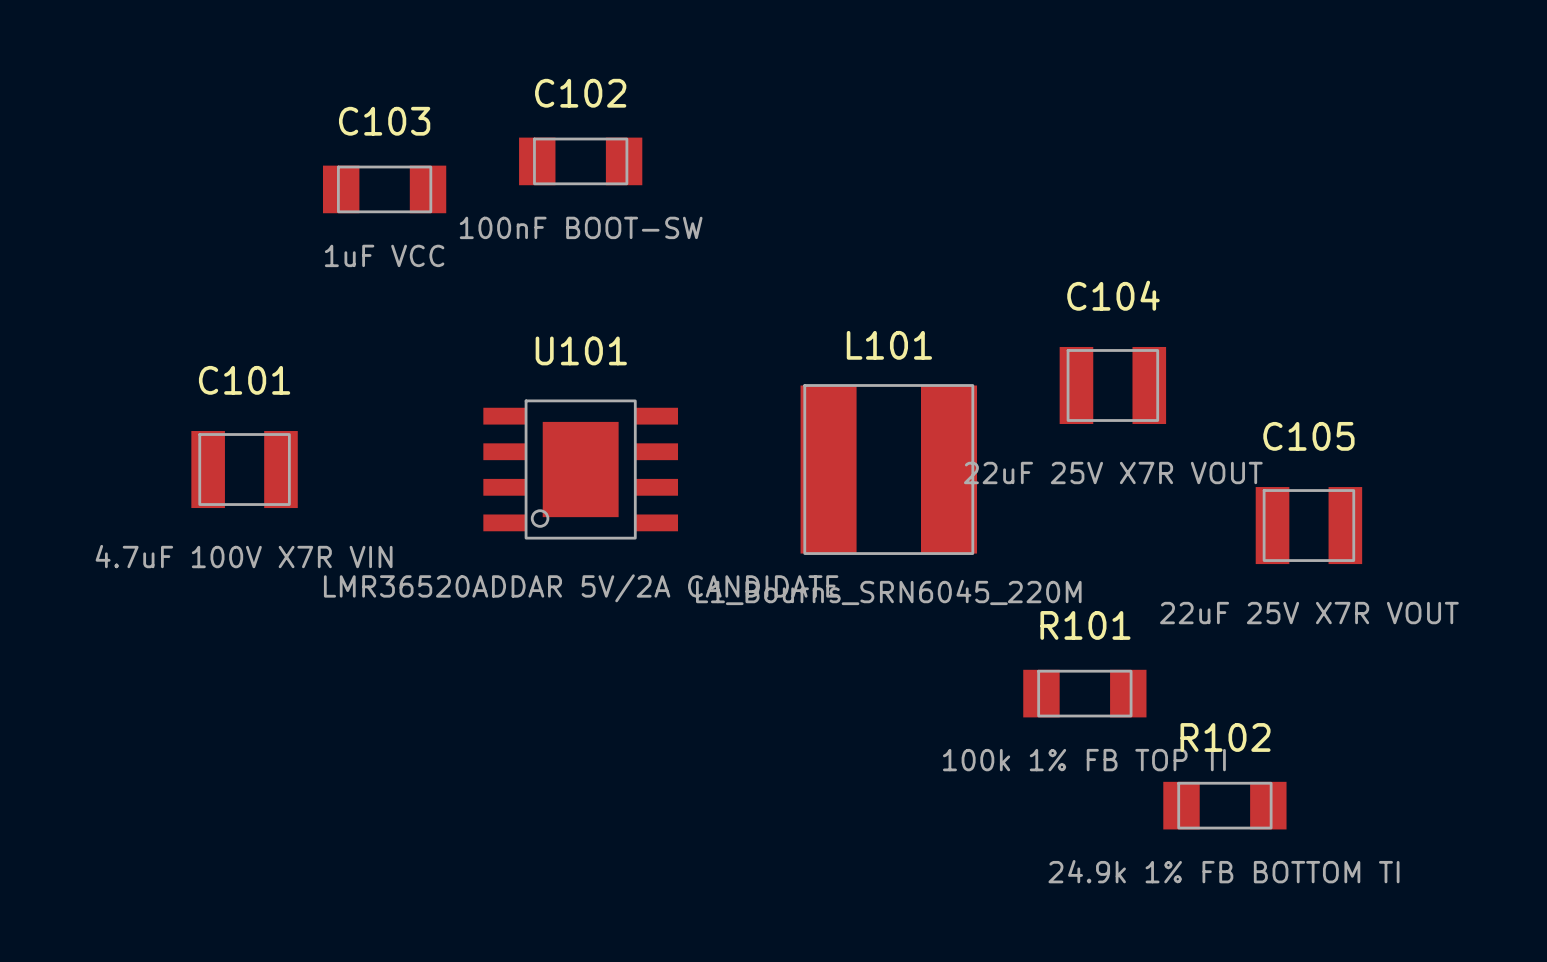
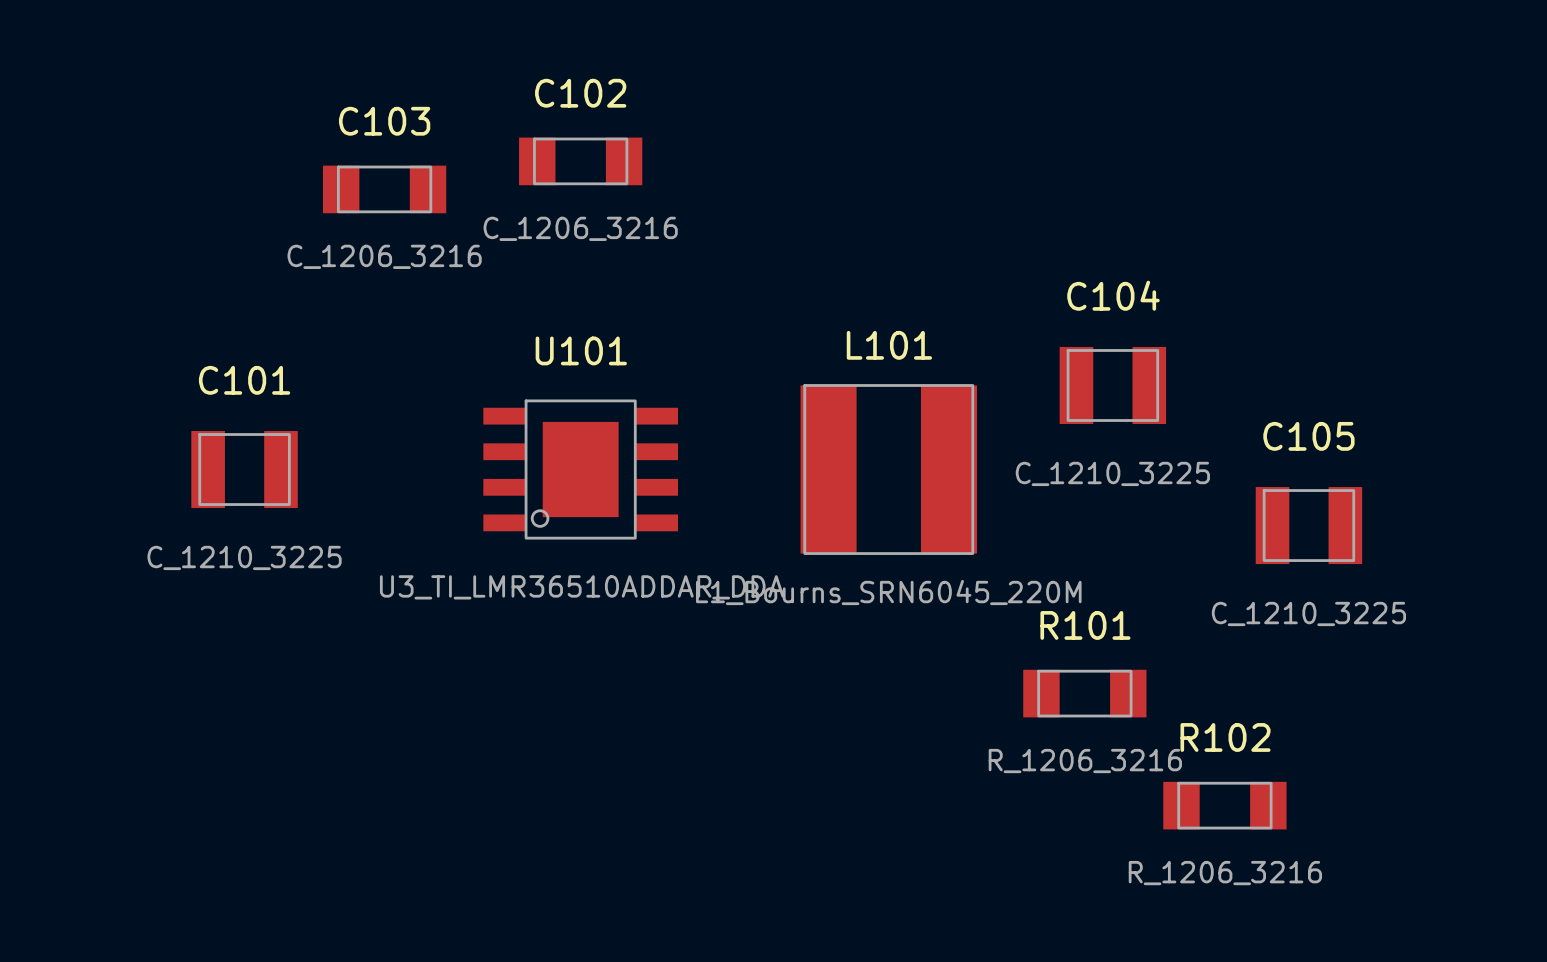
C102 value: 100nF BOOT-SW (581, 227) -> C_1206_3216 (580, 228)
C103 value: 1uF VCC (384, 255) -> C_1206_3216 (384, 256)
C104 value: 22uF 25V X7R VOUT (1113, 472) -> C_1210_3225 (1112, 473)
C101 value: 4.7uF 100V X7R VIN (244, 556) -> C_1210_3225 (244, 557)
U101 value: LMR36520ADDAR 5V/2A CANDIDATE (581, 588) -> U3_TI_LMR36510ADDAR_DDA (582, 587)
C105 value: 22uF 25V X7R VOUT (1309, 613) -> C_1210_3225 (1308, 613)
R101 value: 100k 1% FB TOP TI (1084, 760) -> R_1206_3216 (1085, 761)
R102 value: 24.9k 1% FB BOTTOM TI (1223, 871) -> R_1206_3216 (1225, 873)

